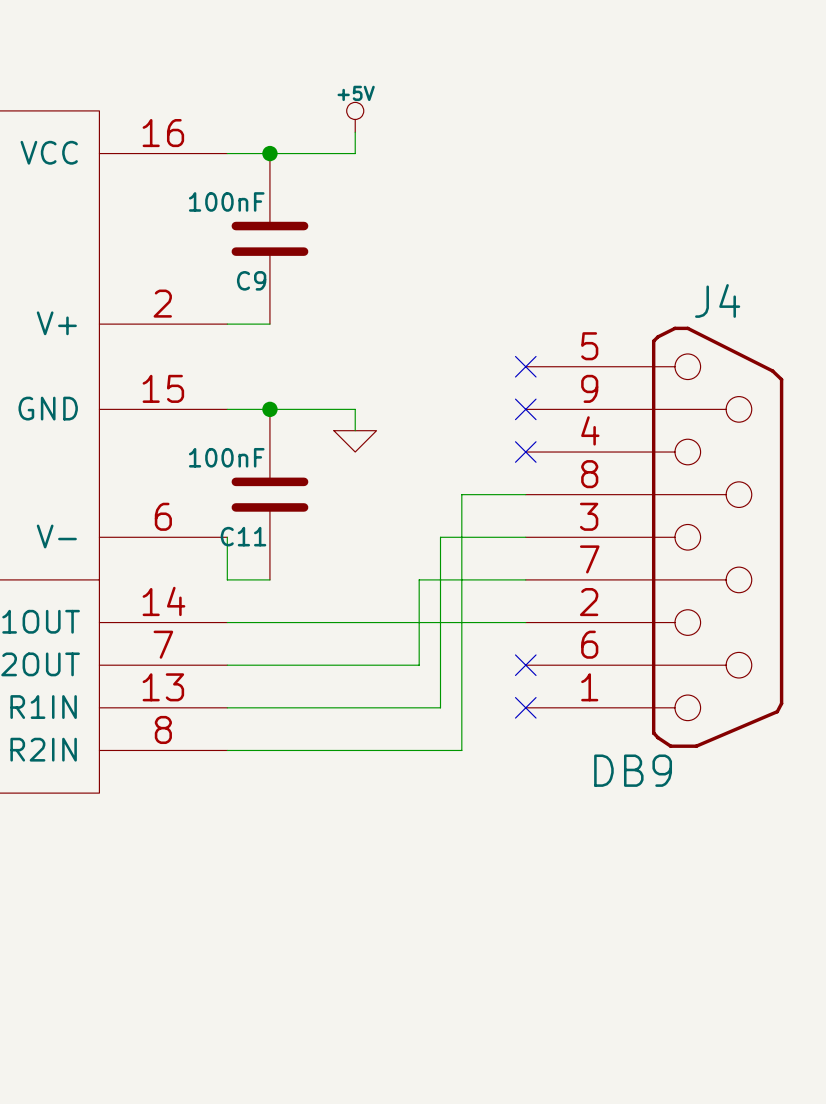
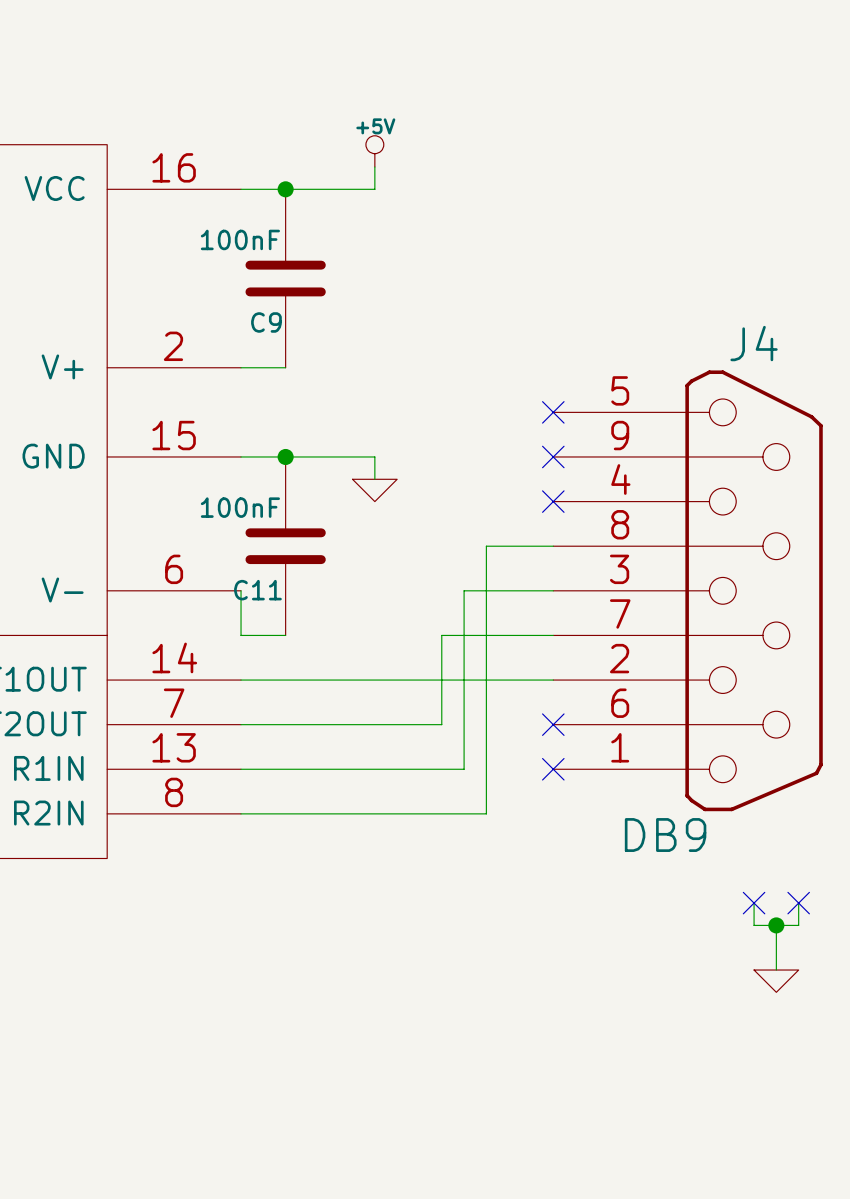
wire: none -> (754, 903) (754, 925) (798, 925) (798, 903)
no-connect mark: none -> (754, 903)
no-connect mark: none -> (798, 903)
wire: none -> (776, 925) (776, 970)
junction: none -> (776, 925)
power symbol: none -> (776, 981)

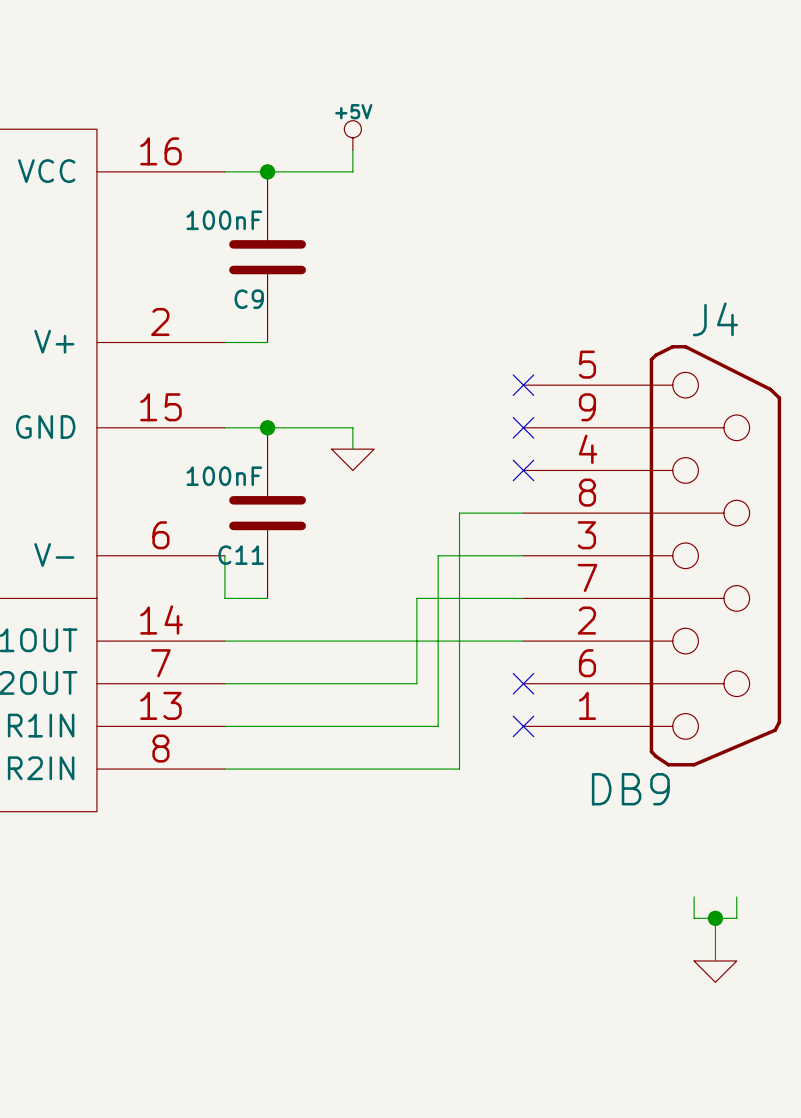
wire: (754, 903) (754, 925) (798, 925) (798, 903) -> none
no-connect mark: (754, 903) -> none
no-connect mark: (798, 903) -> none
wire: (776, 925) (776, 947) -> none
junction position: (776, 925) -> (715, 918)
wire: none -> (694, 897) (694, 918) (736, 918)
wire: none -> (715, 918) (715, 960)
power symbol position: (776, 981) -> (715, 971)

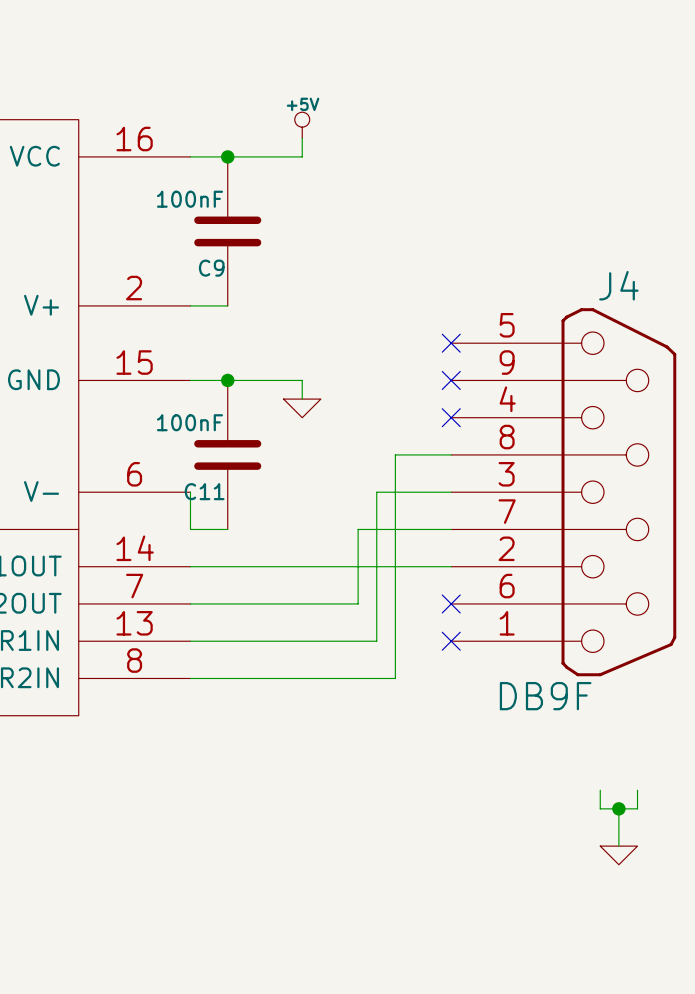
J4 value: DB9 (630, 789) -> DB9F (545, 696)

